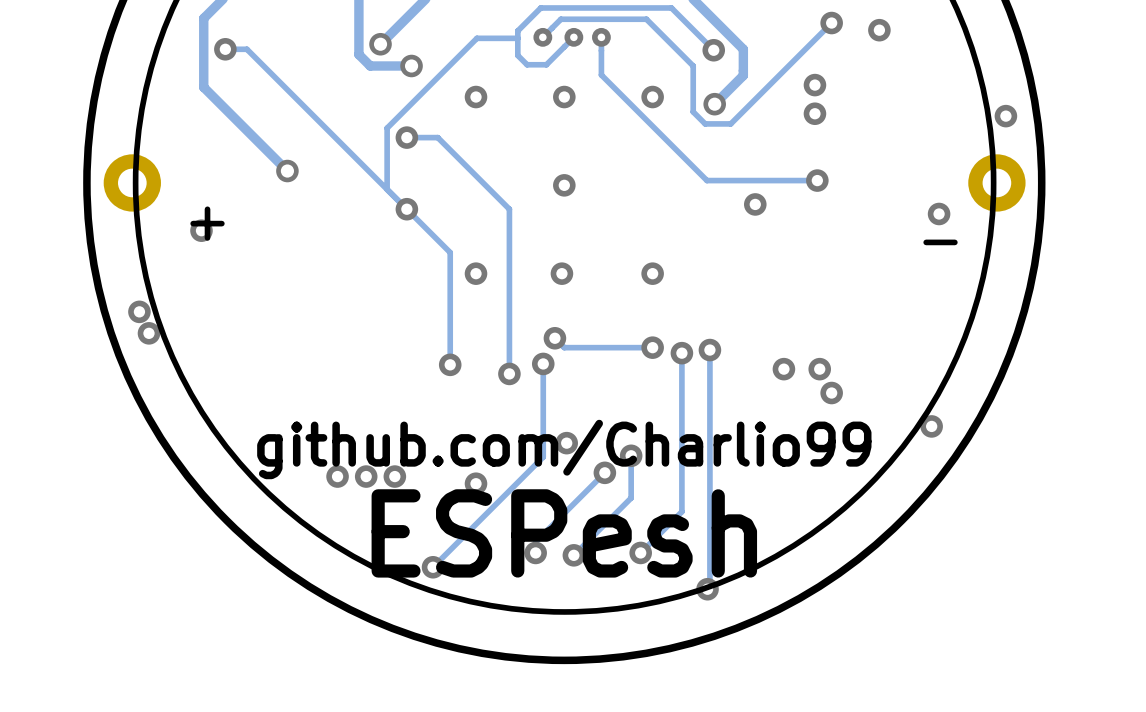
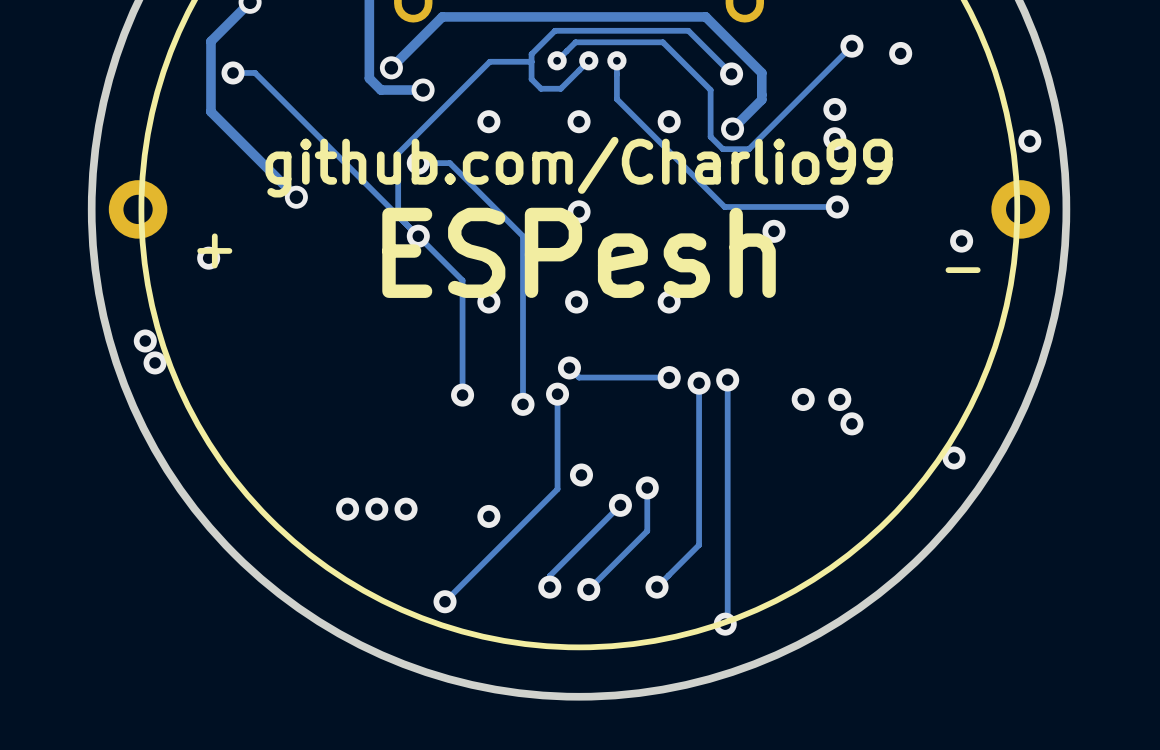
text position: github.com/Charlio99 (564, 449) -> github.com/Charlio99 (579, 167)
text position: ESPesh (564, 533) -> ESPesh (579, 252)

